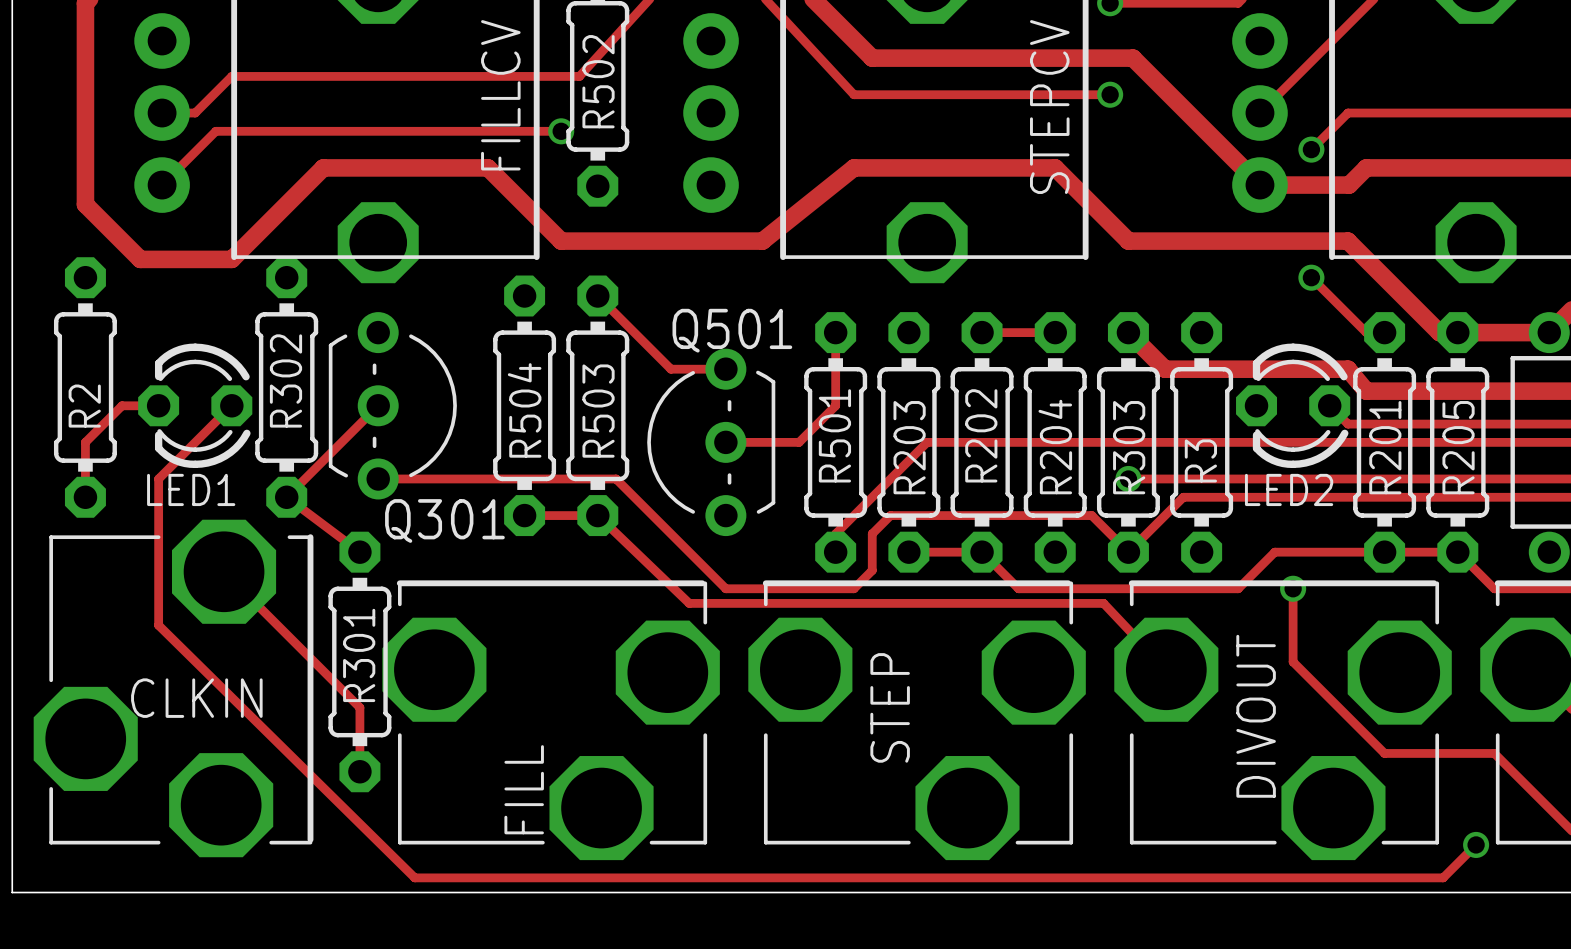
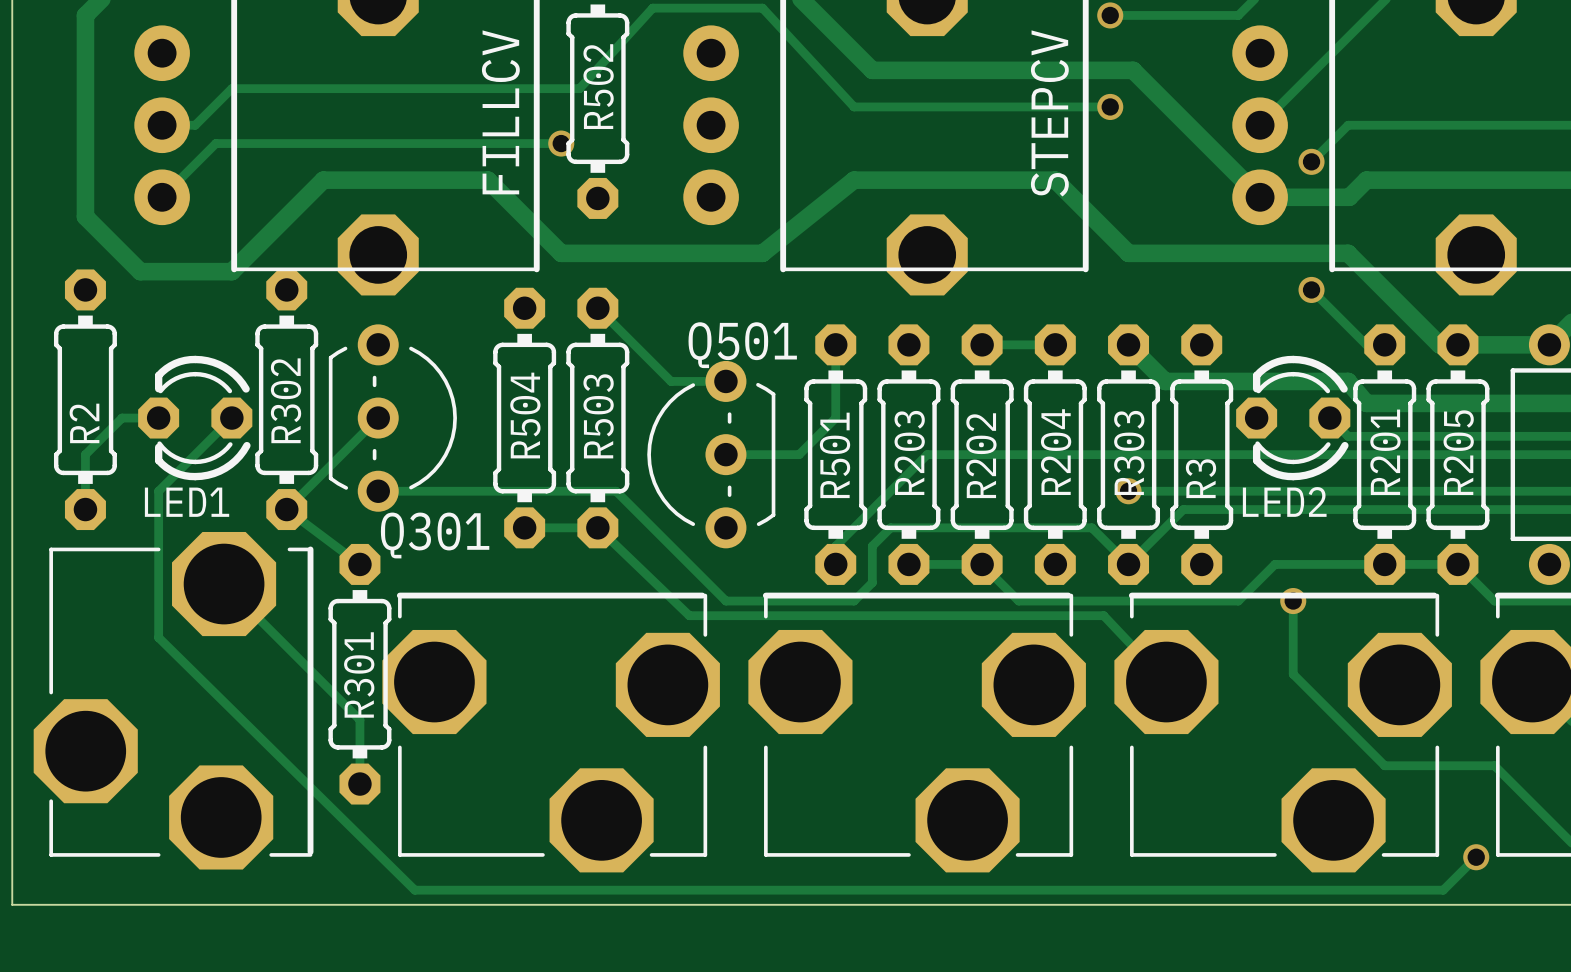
CLKIN name: CLKIN (196, 698) -> none
STEP name: STEP (890, 707) -> none
DIVOUT name: DIVOUT (1256, 716) -> none
FILL name: FILL (524, 789) -> none

